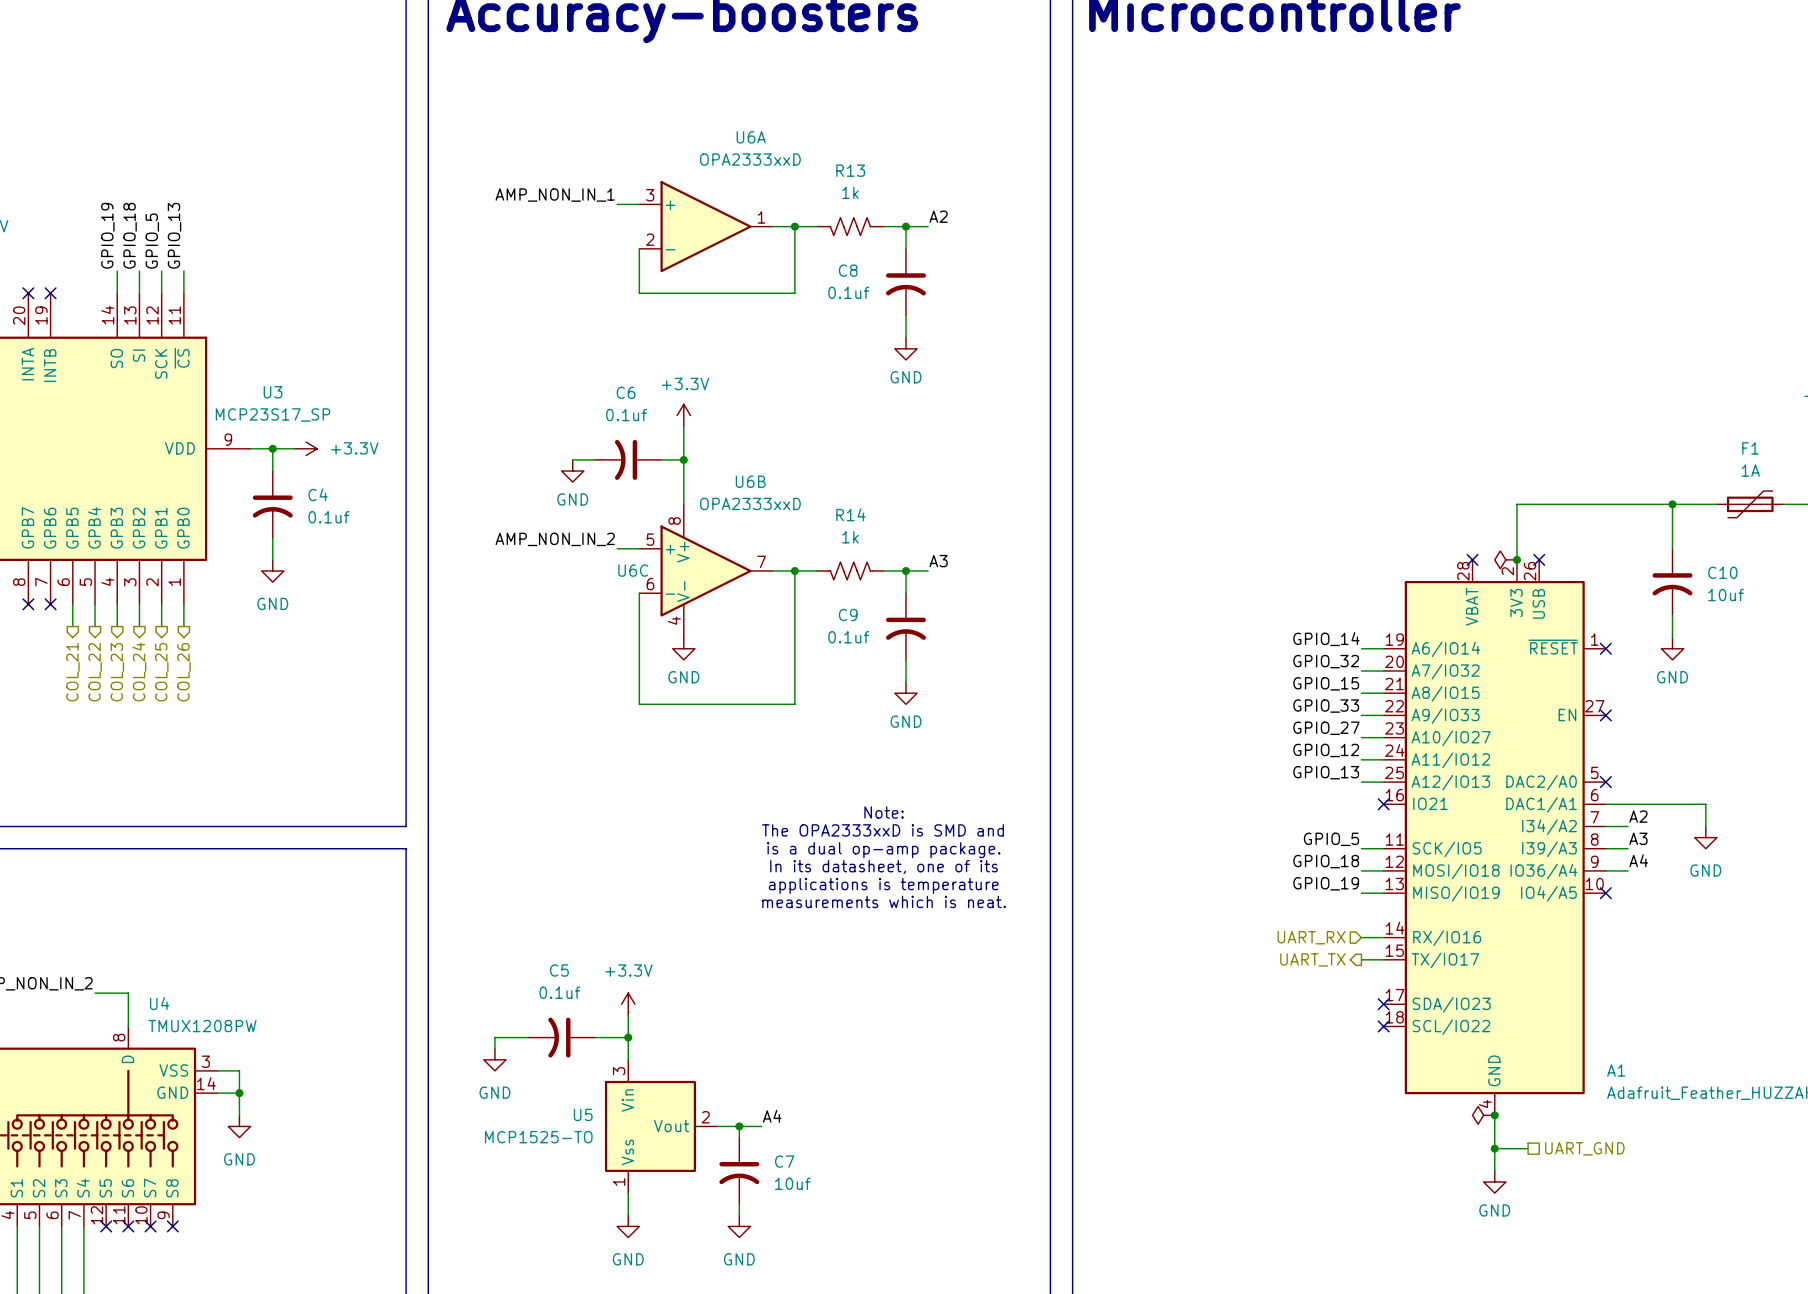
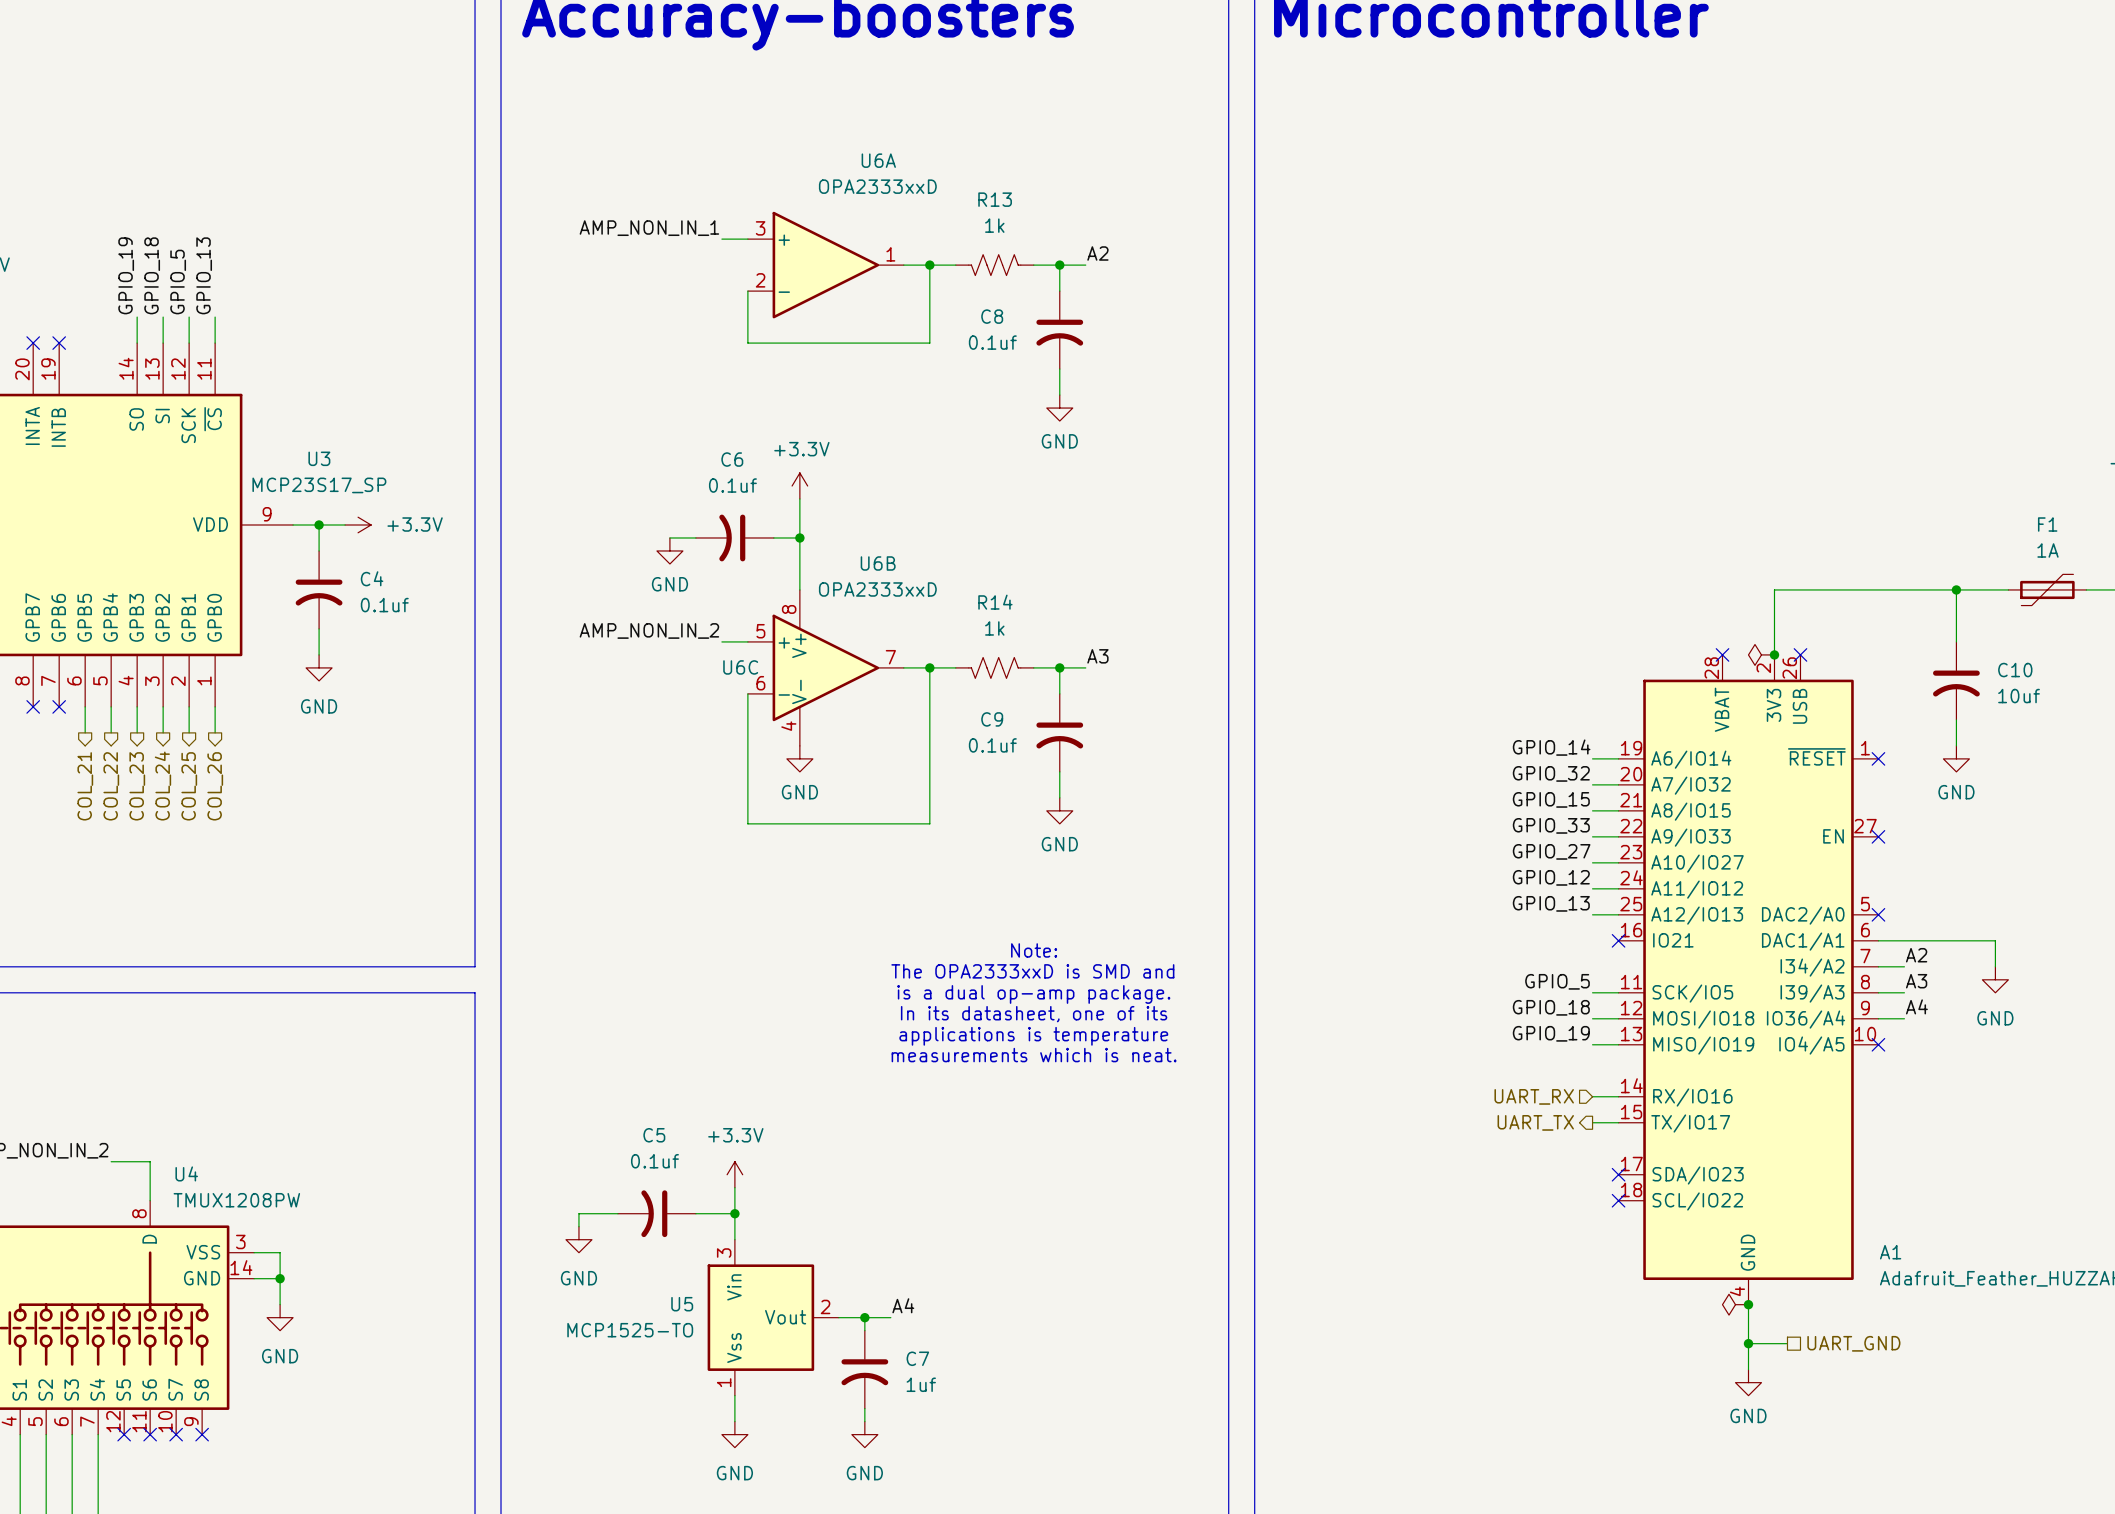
C7 value: 10uf (792, 1183) -> 1uf (921, 1384)

